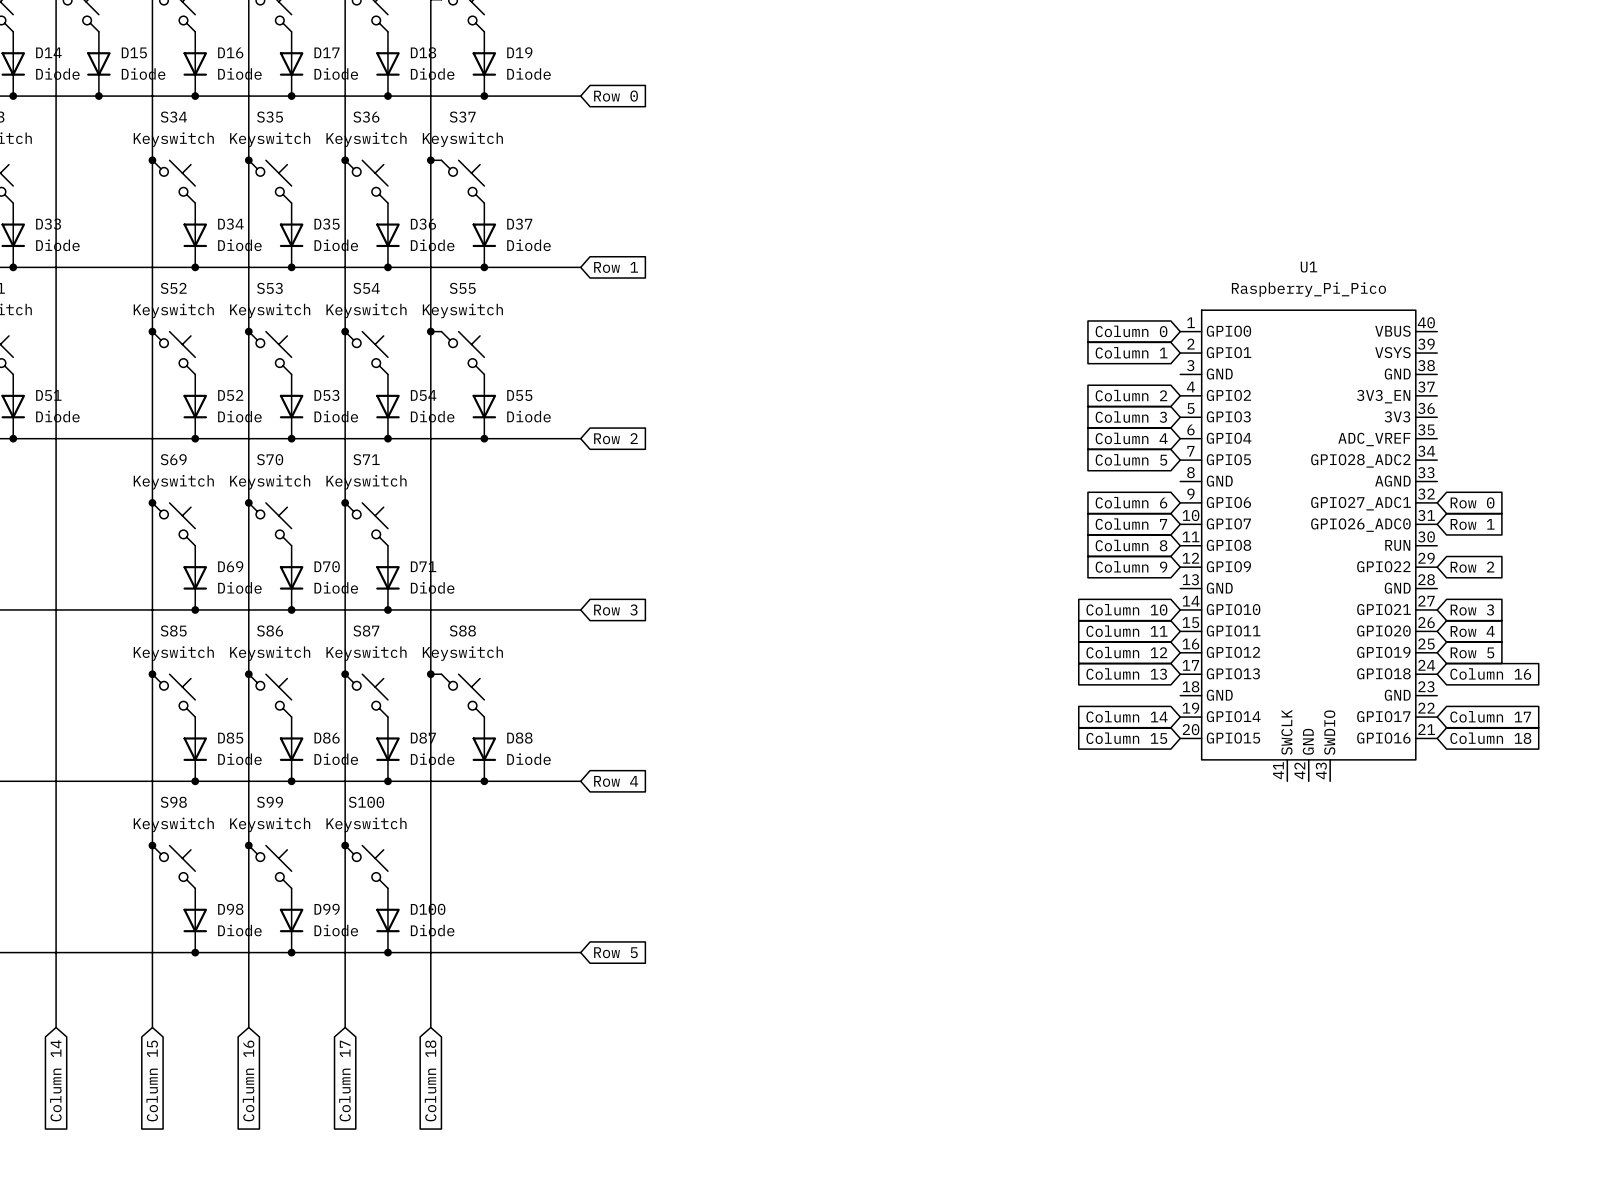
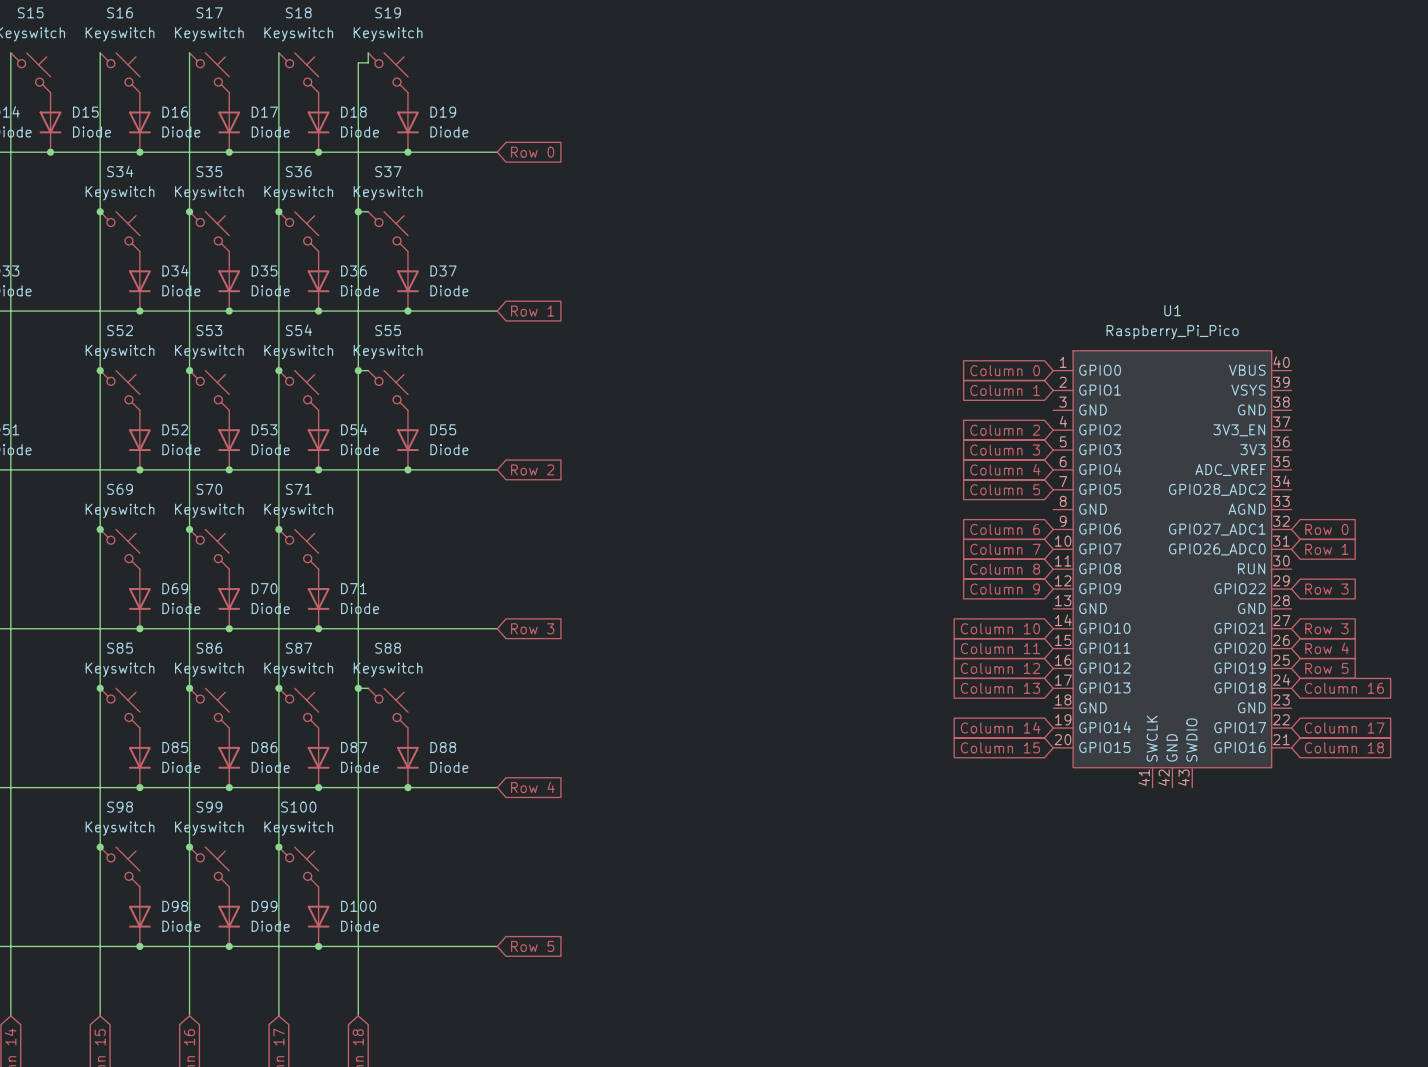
global label: Row 2 (1472, 567) -> Row 3 (1326, 589)

